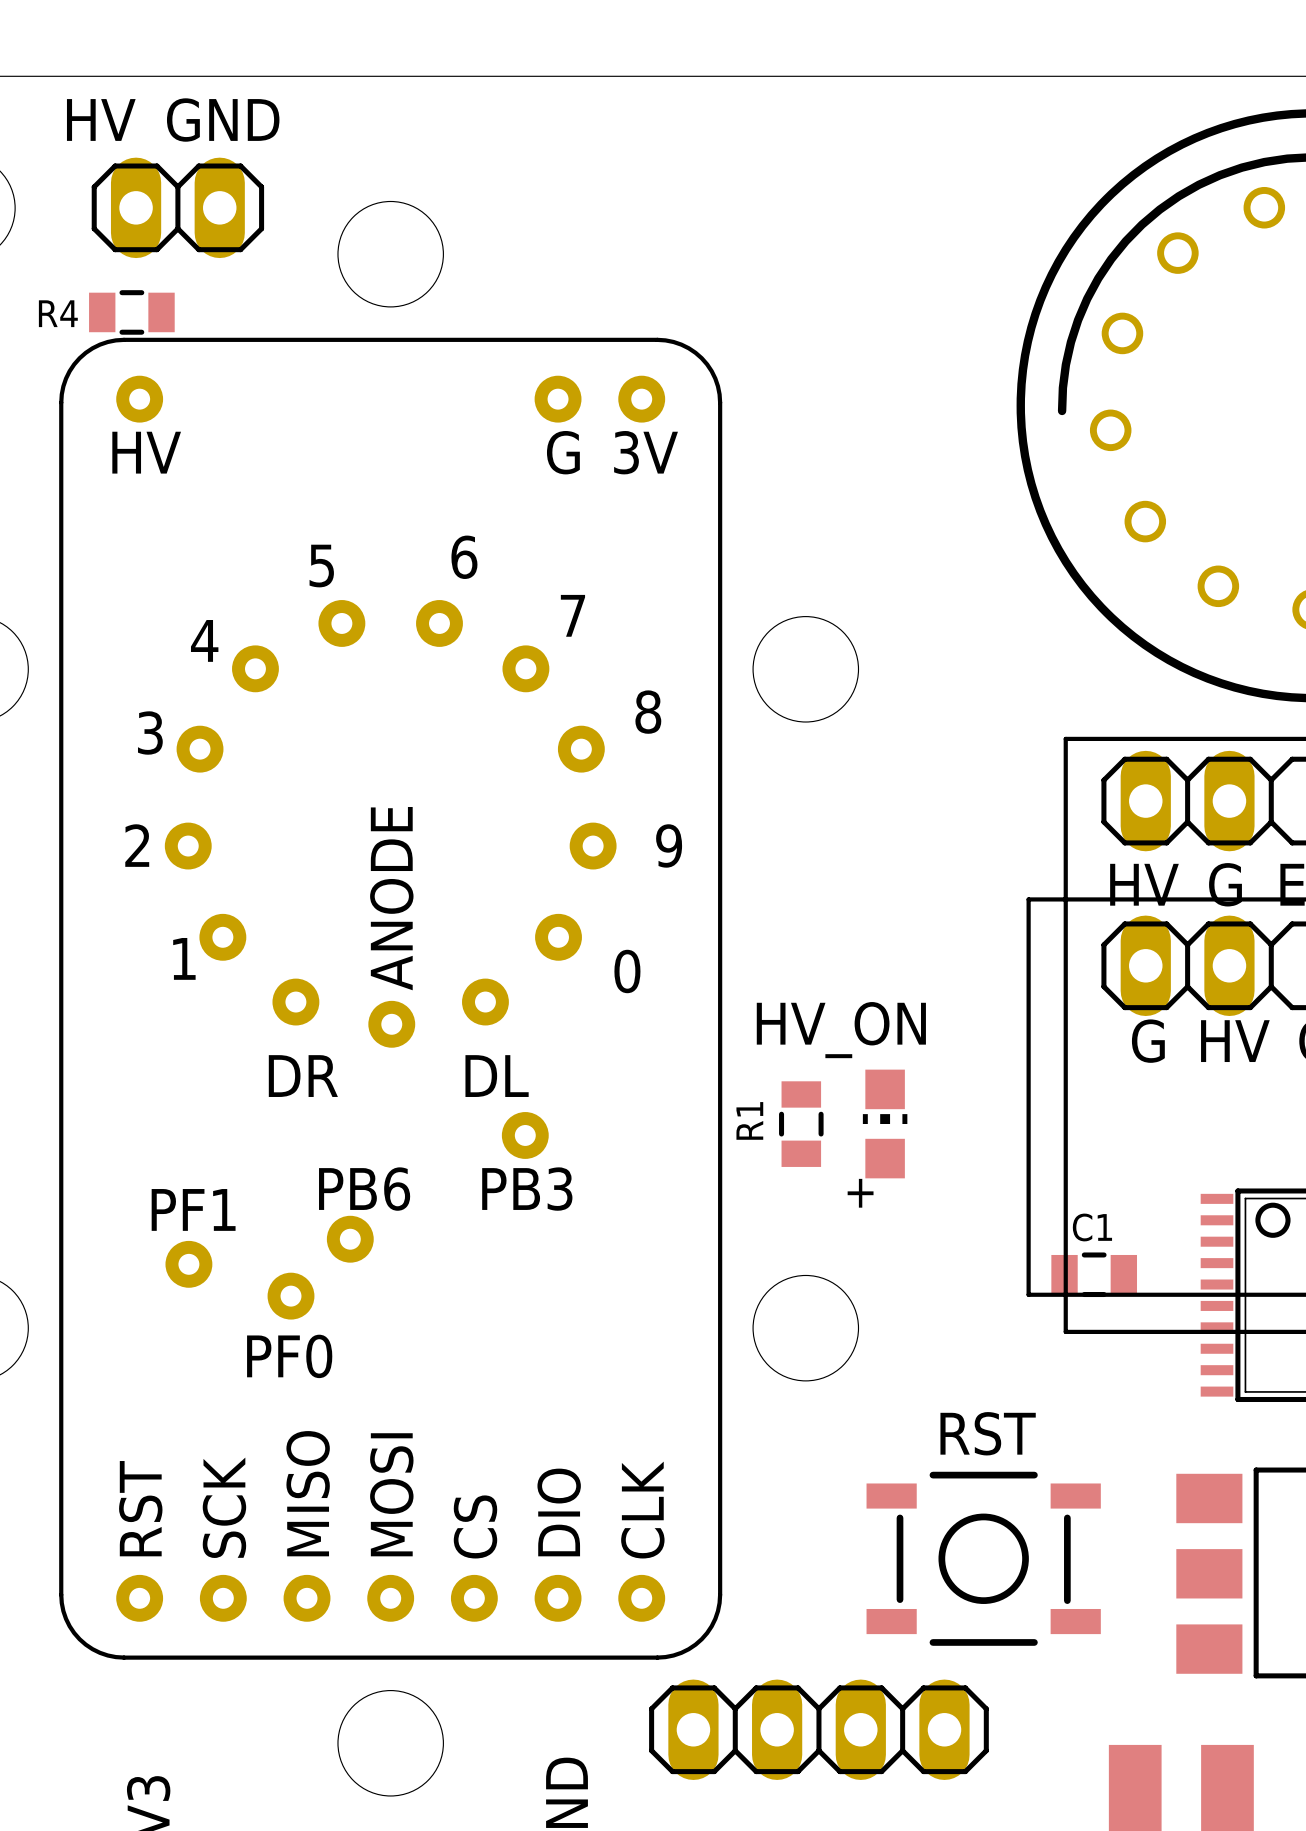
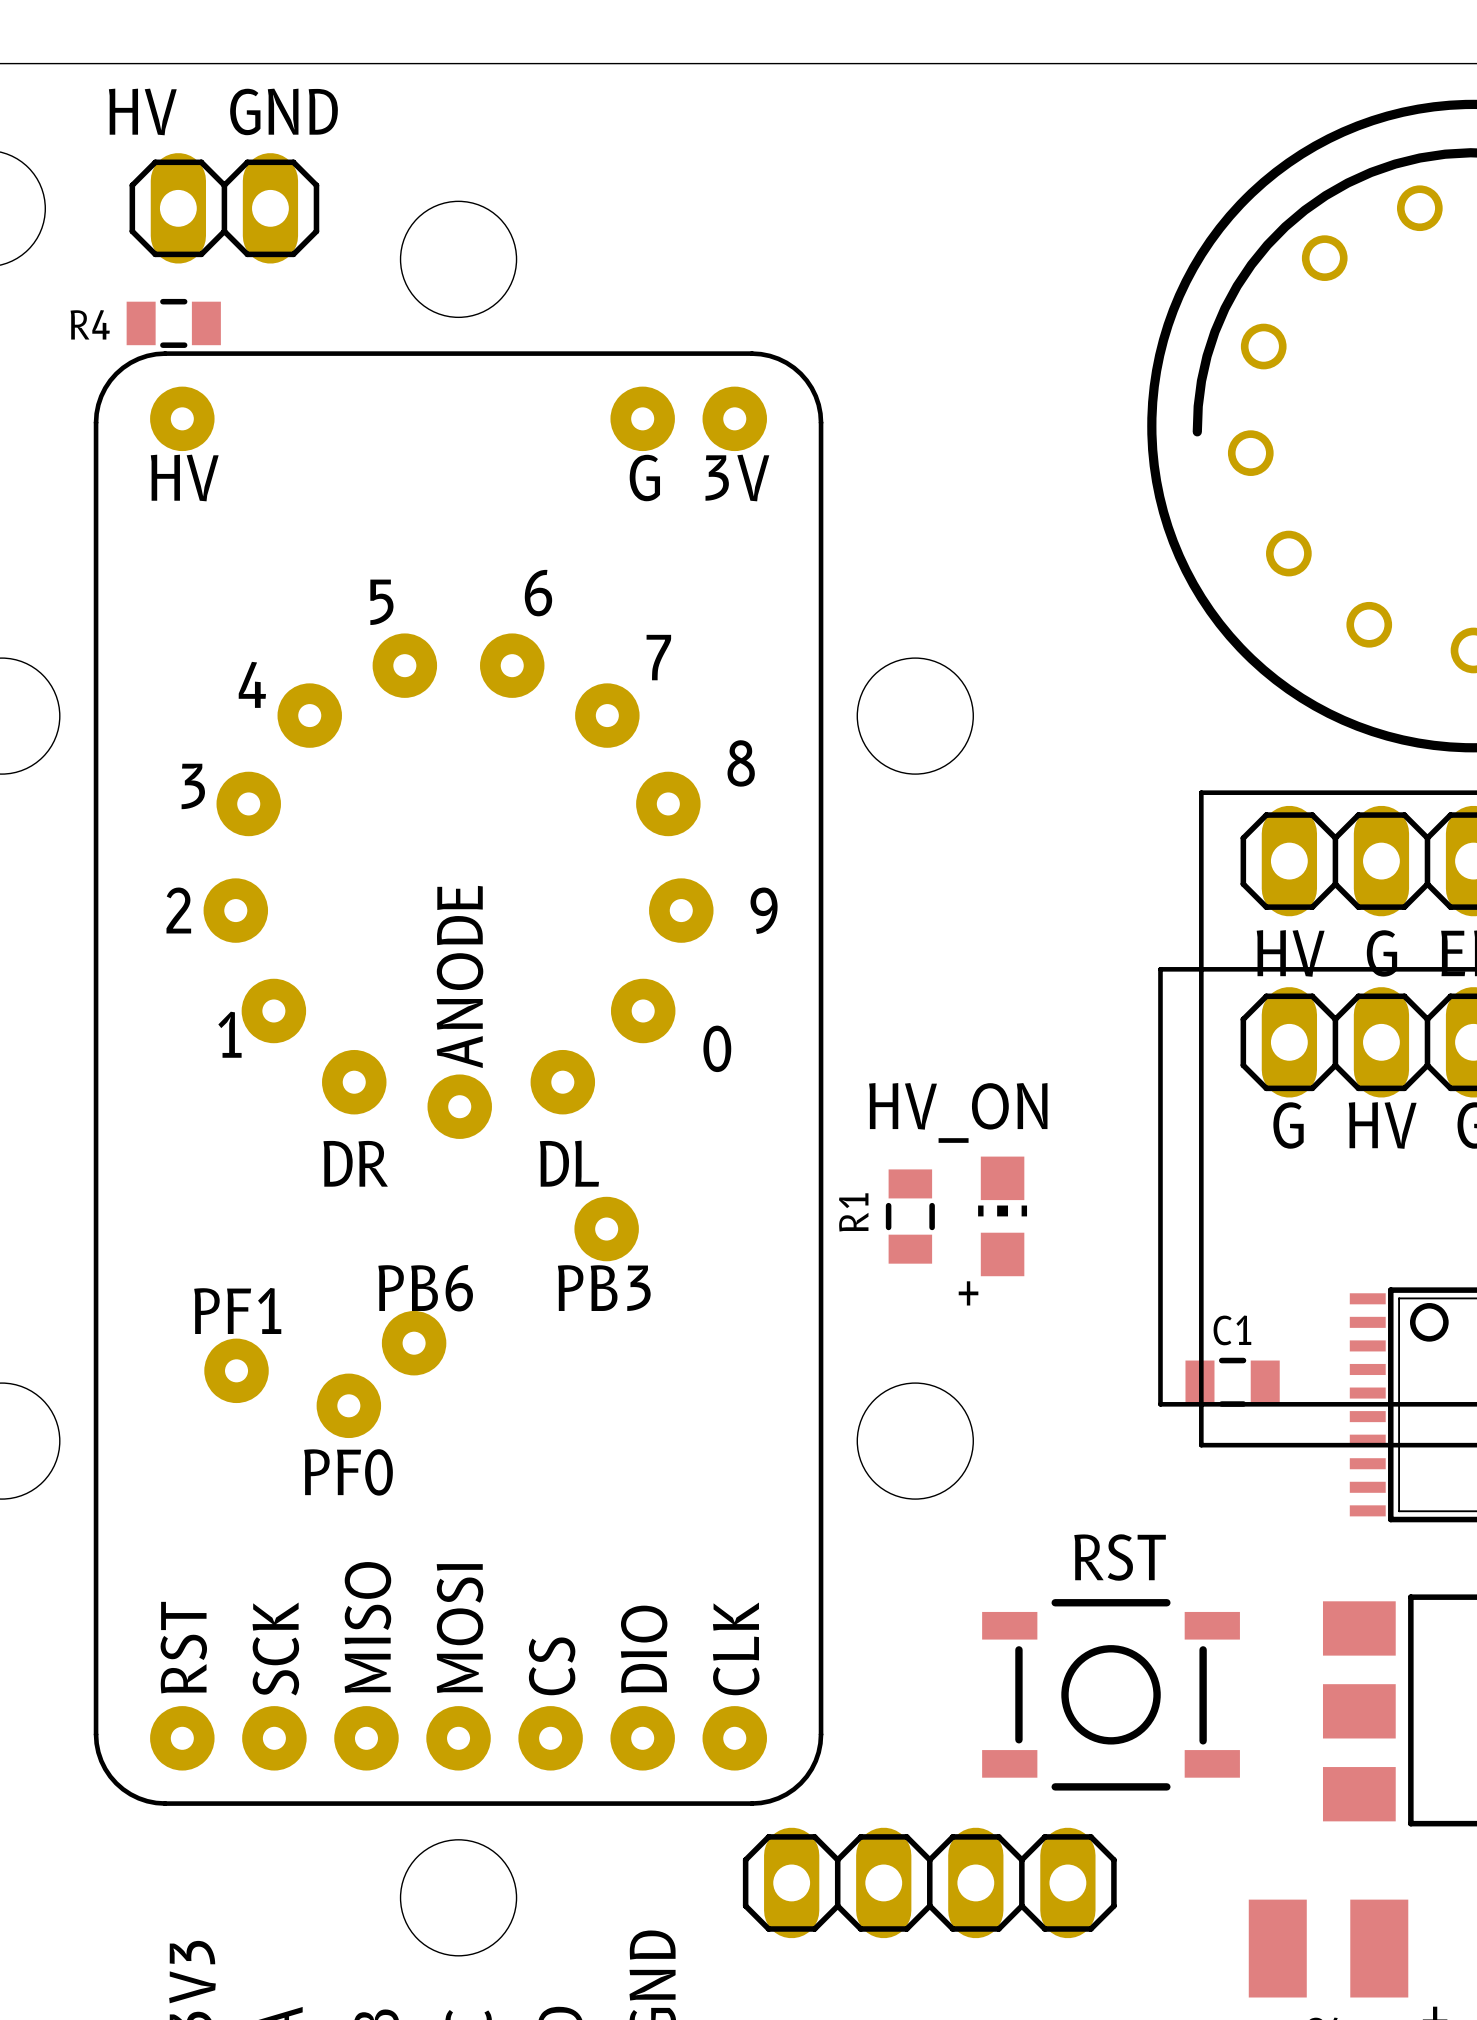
part footprint: [59, 337, 723, 1660] -> [93, 351, 824, 1806]

